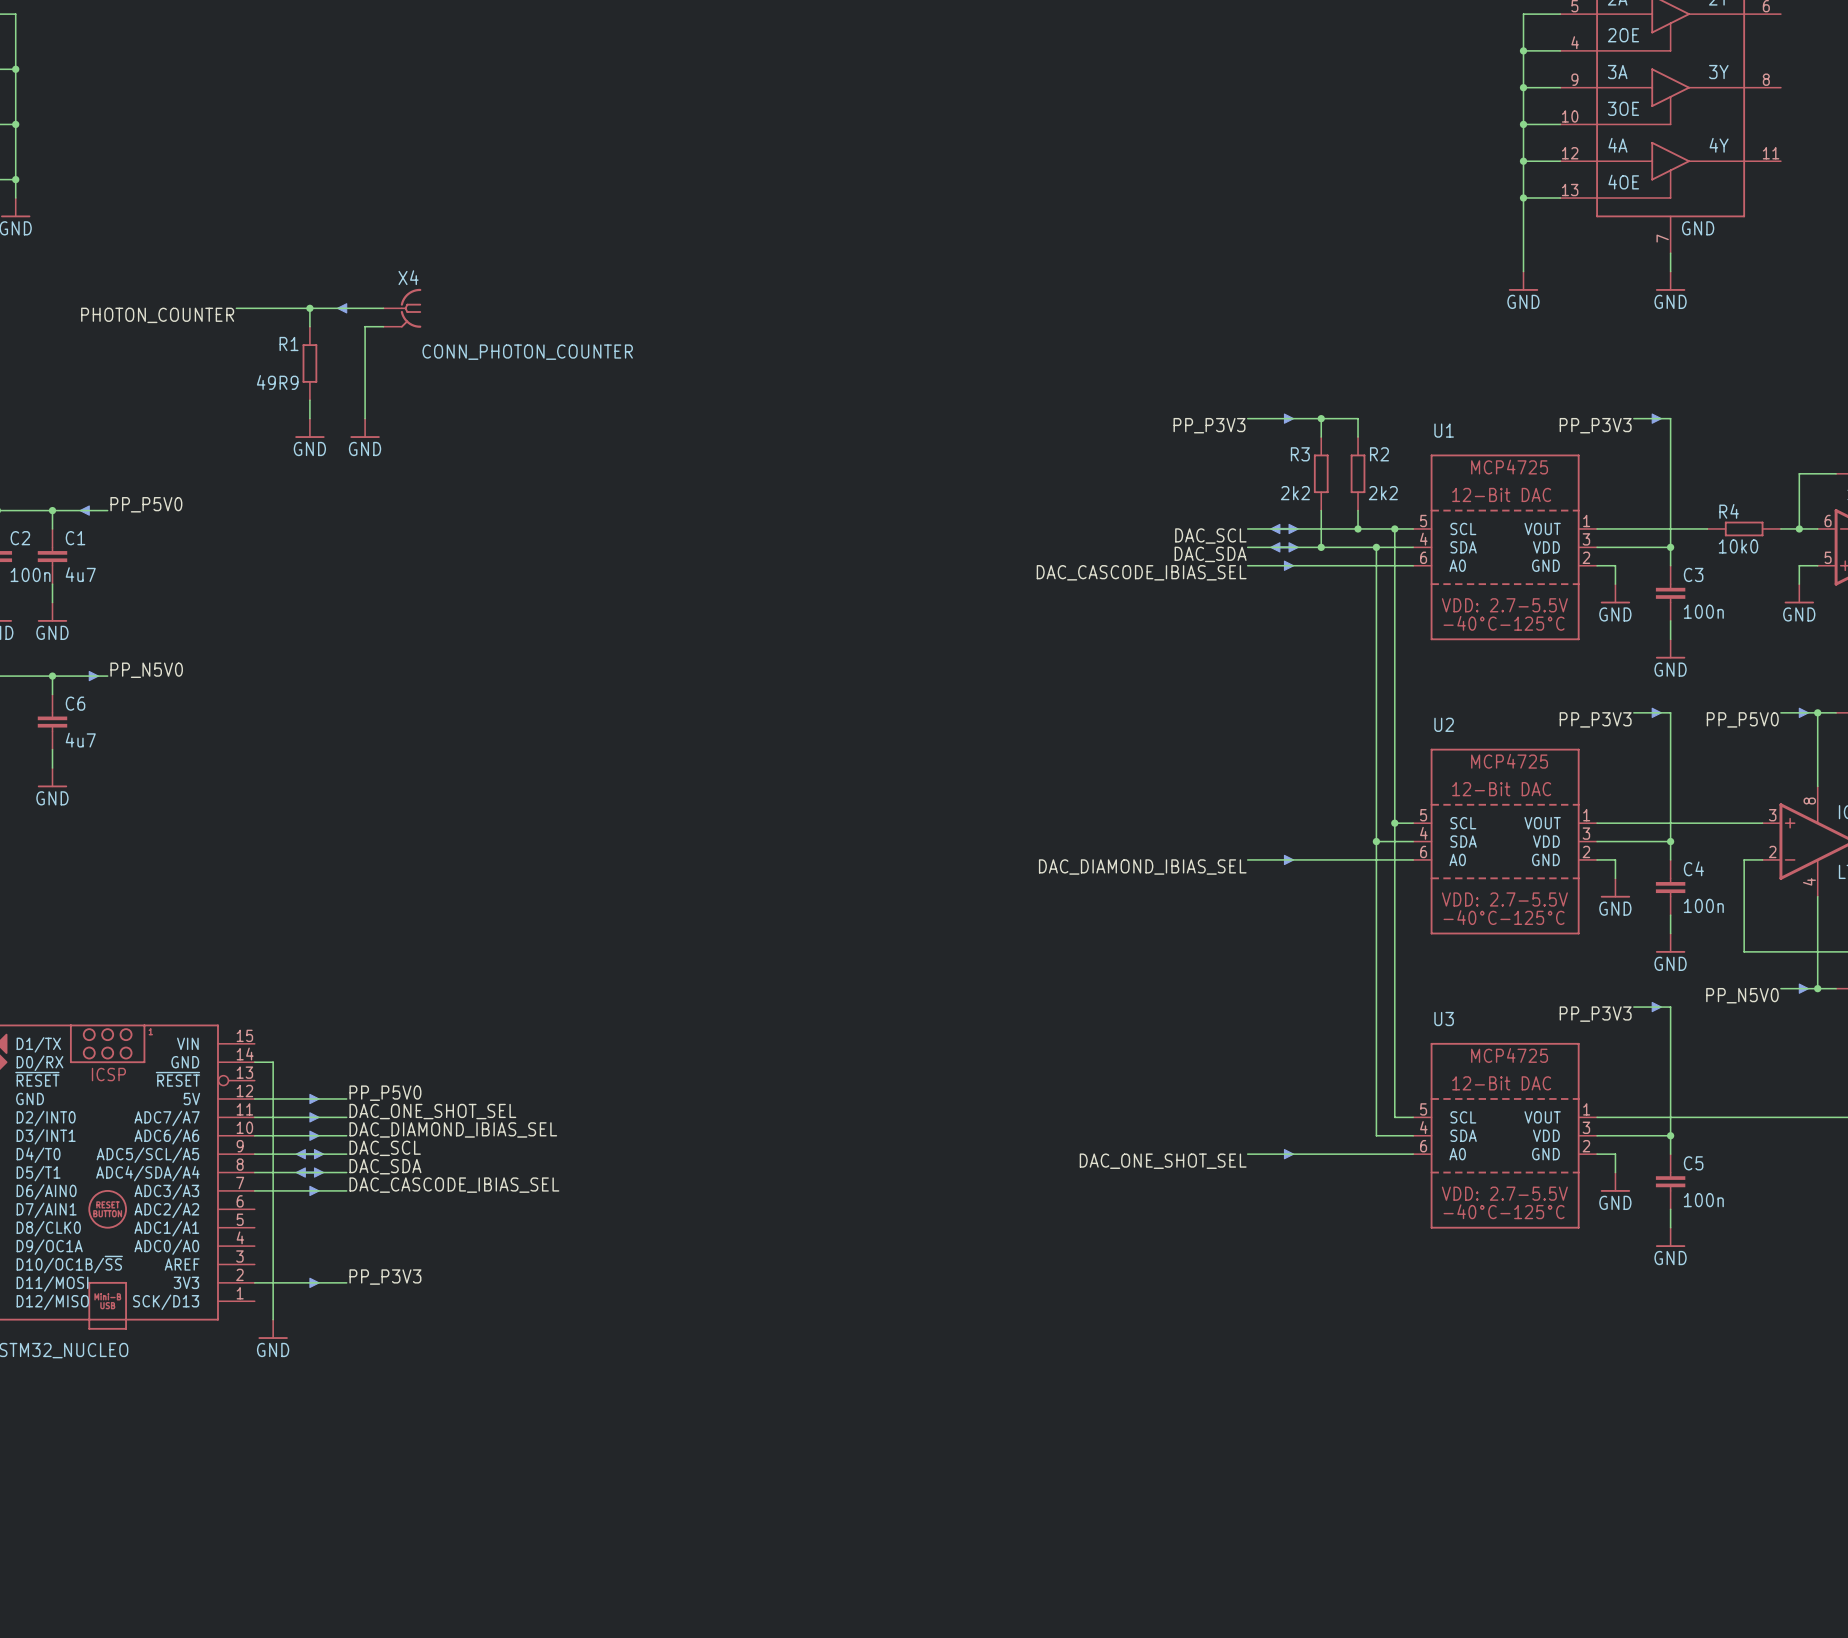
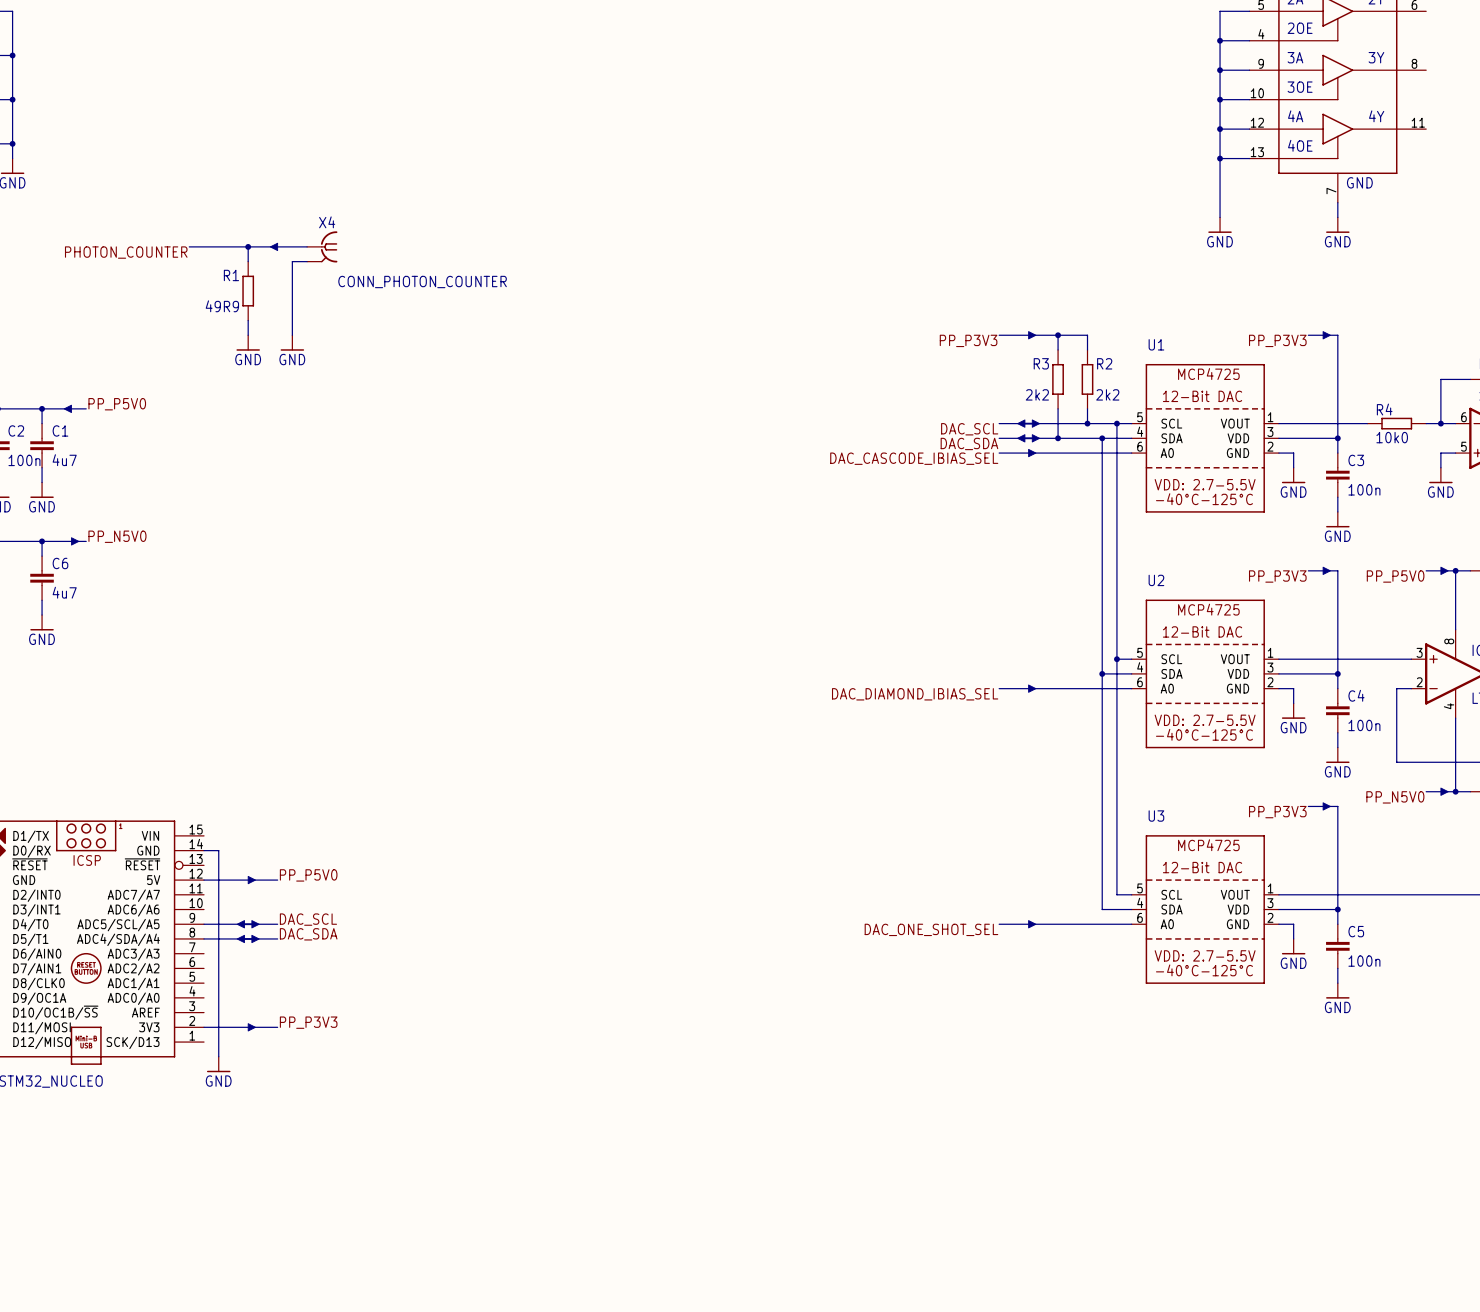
label: DAC_ONE_SHOT_SEL (432, 1111) -> none
wire: (254, 1117) (346, 1117) -> none
part: (314, 1117) -> none
label: DAC_DIAMOND_IBIAS_SEL (453, 1129) -> none
wire: (254, 1135) (346, 1135) -> none
part: (314, 1135) -> none
label: DAC_CASCODE_IBIAS_SEL (454, 1185) -> none
wire: (254, 1190) (346, 1190) -> none
part: (314, 1190) -> none

